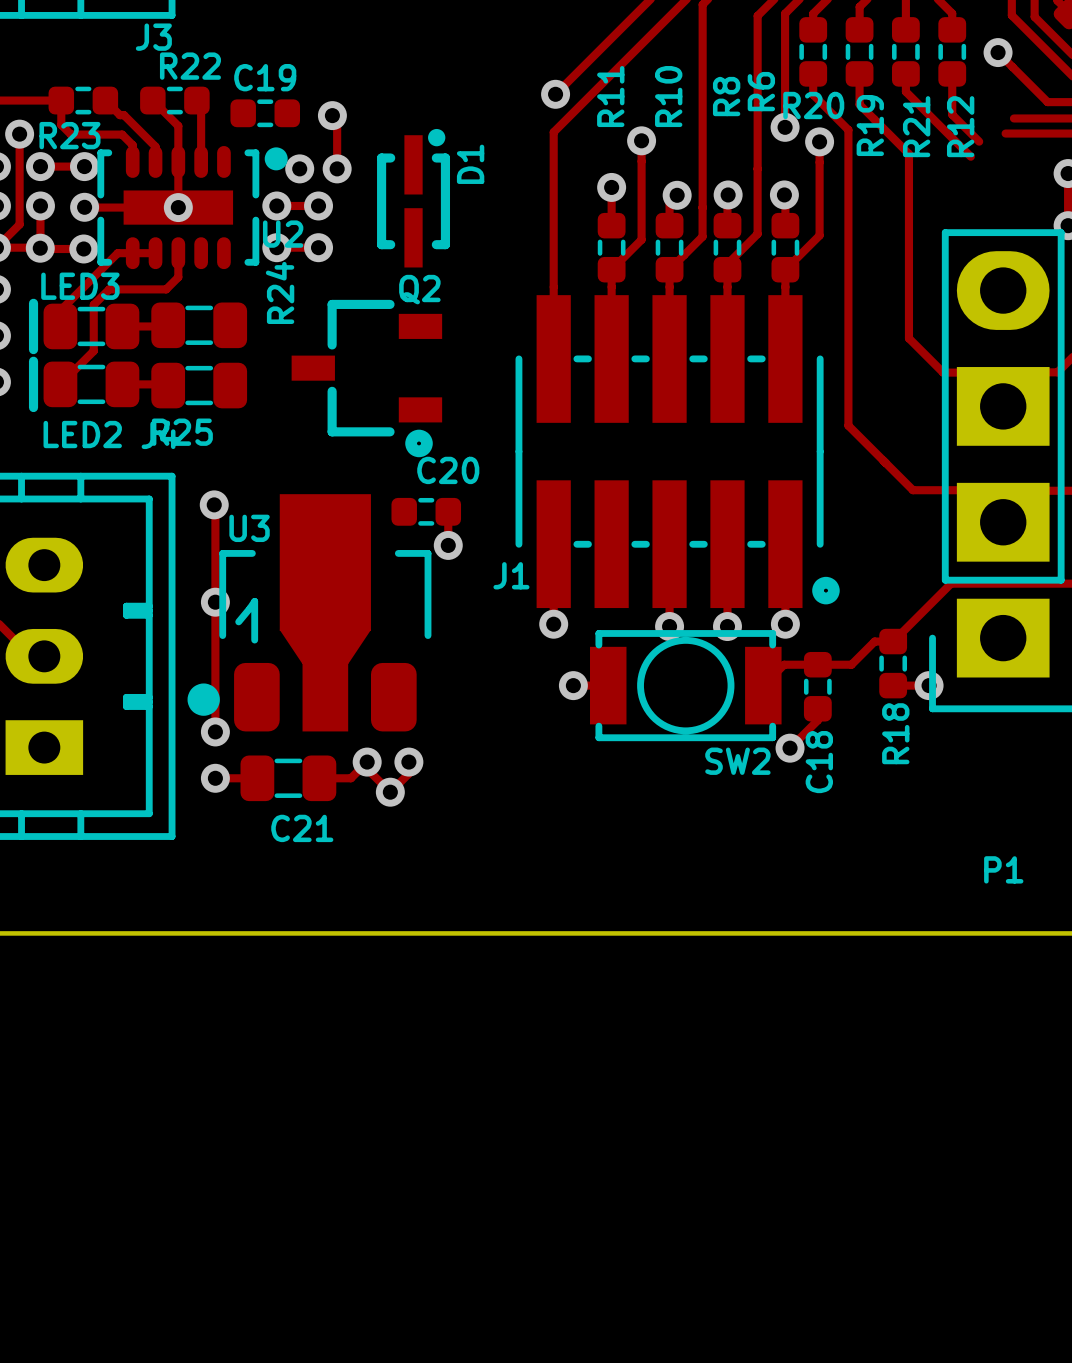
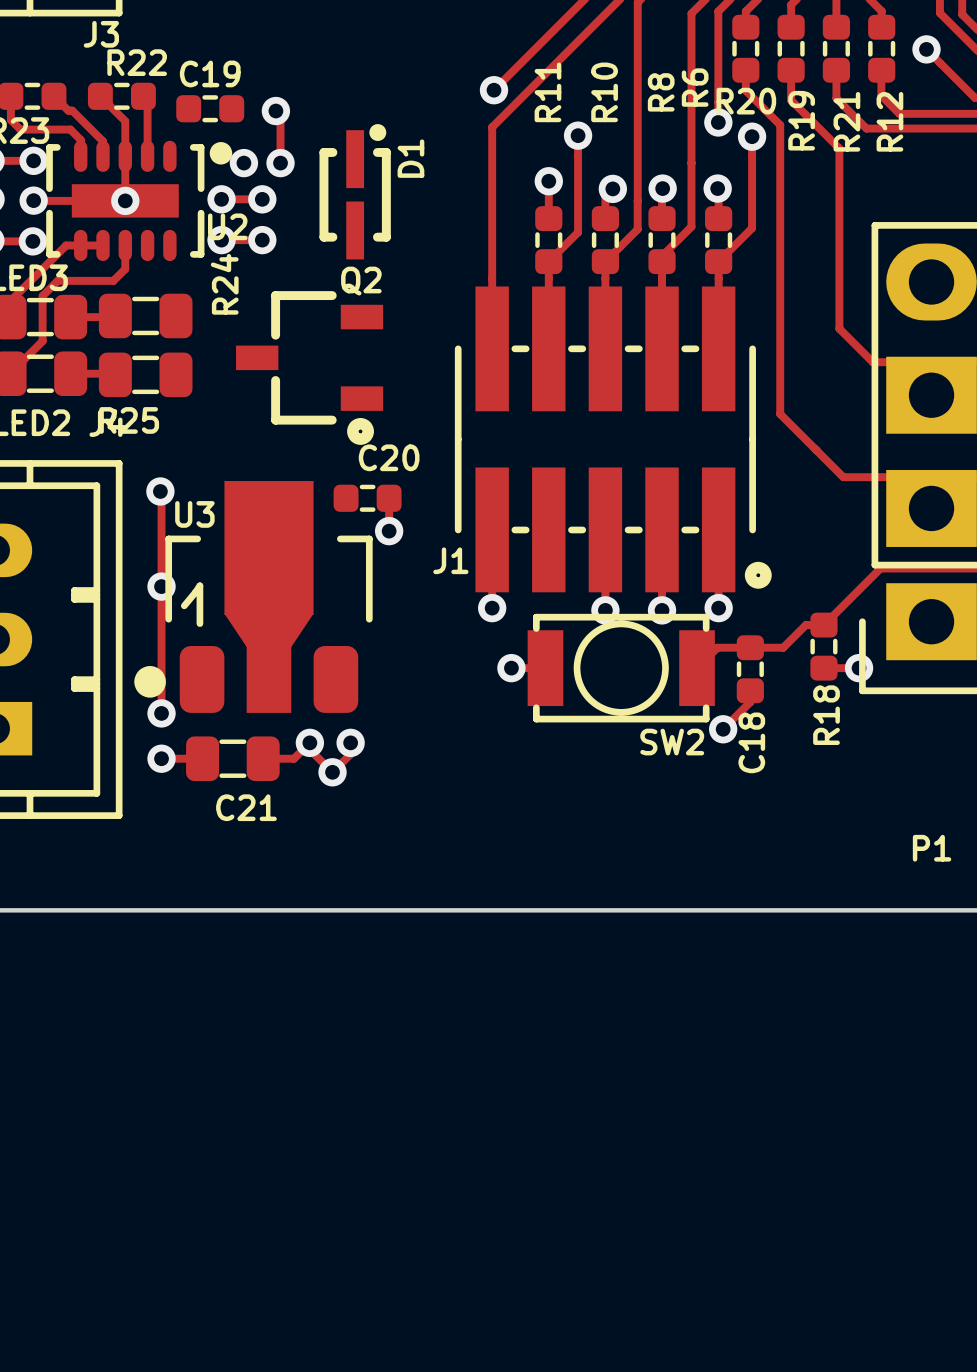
track: (952, 73) (952, 114) (979, 141) -> (881, 70) (881, 95) (899, 113) (942, 113)
track: (905, 91) (970, 156) -> (836, 87) (836, 98) (866, 128) (933, 128)

